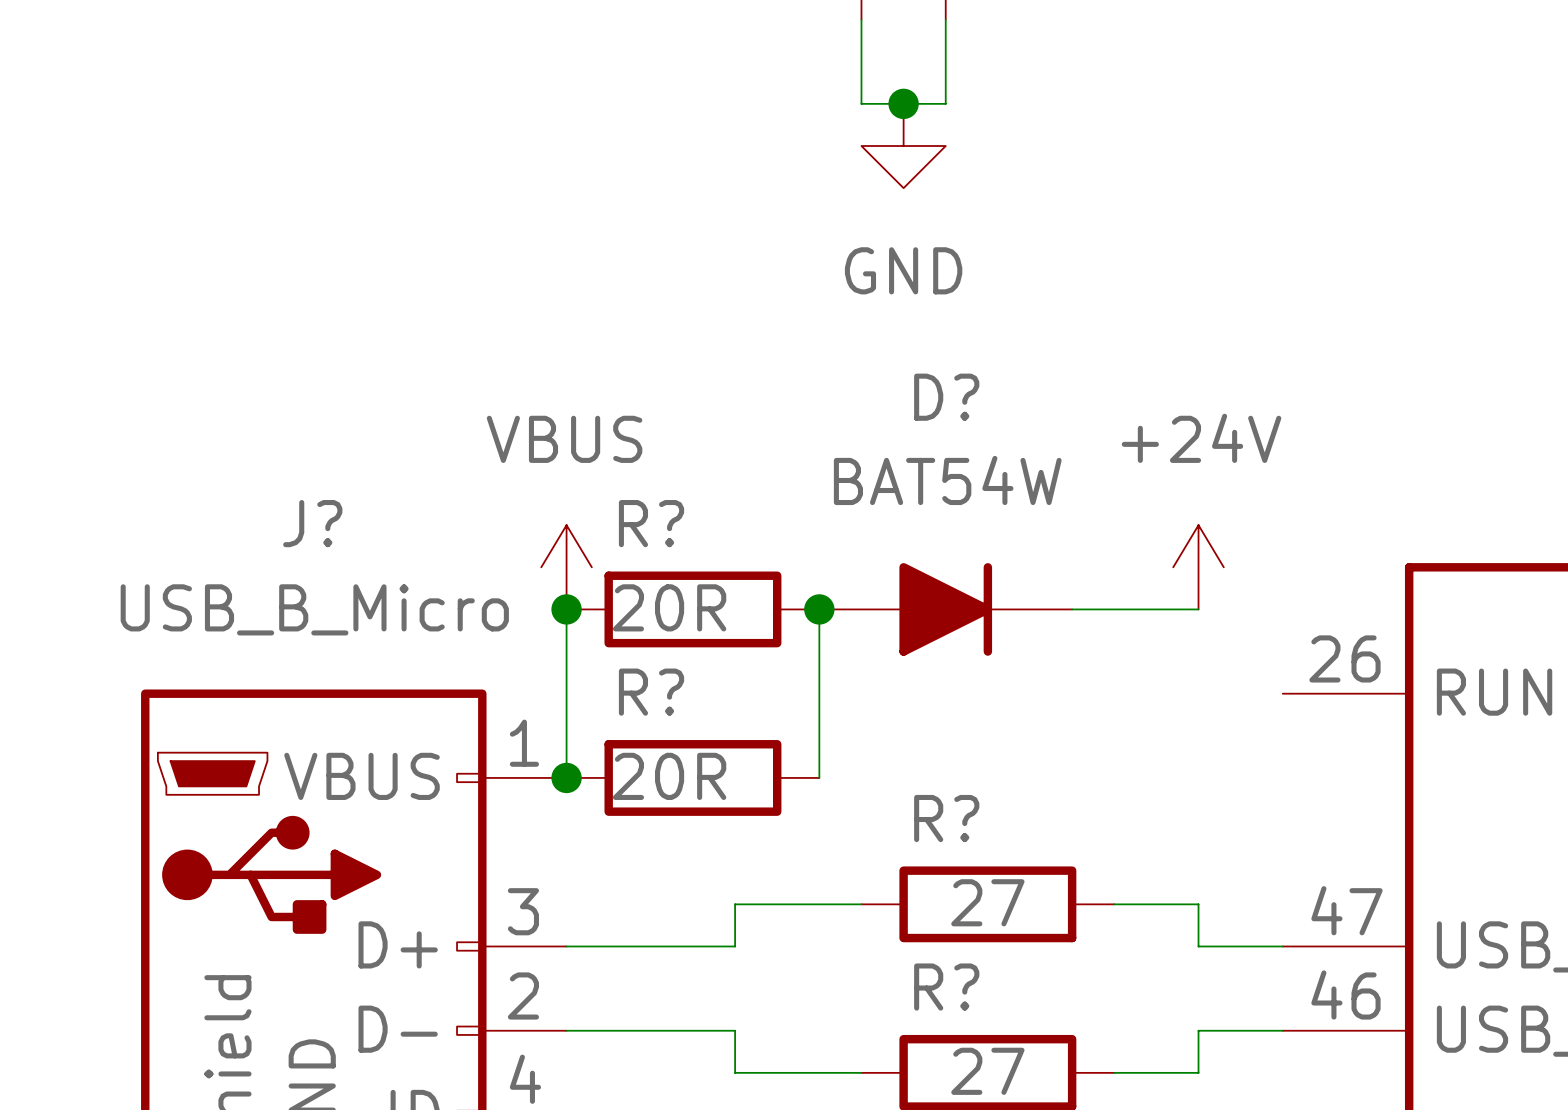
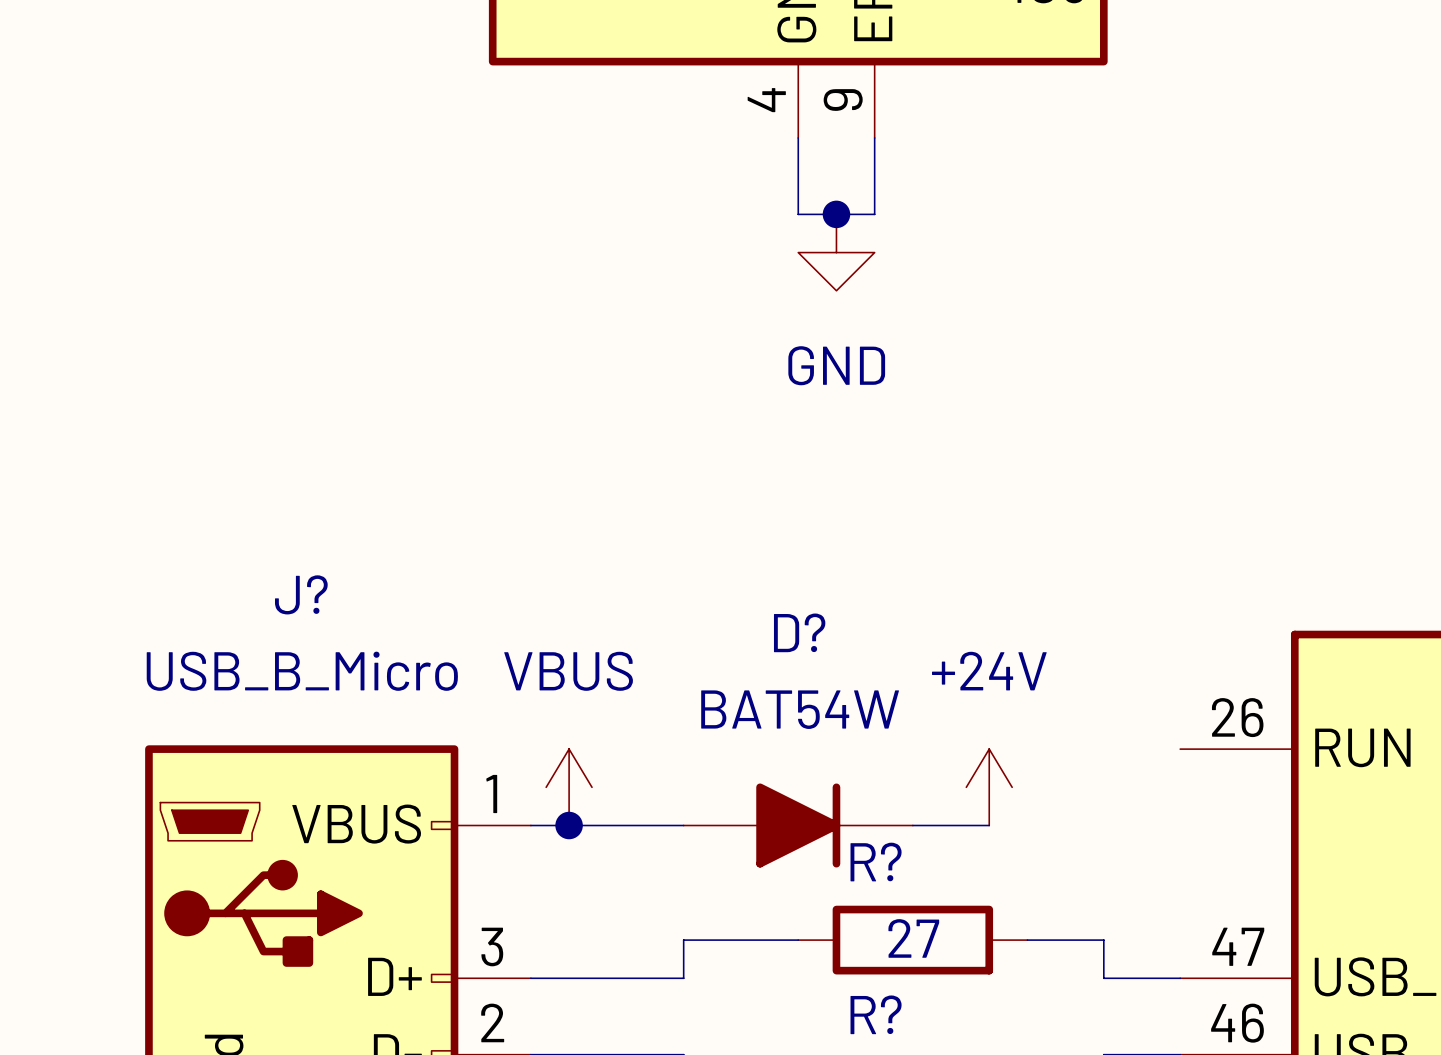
power symbol position: VBUS (566, 567) -> VBUS (569, 787)
power symbol position: +24V (1198, 567) -> +24V (989, 787)
wire: (566, 609) (566, 777) -> (683, 825) (530, 825)
junction: (566, 609) -> none
R?: 20R (692, 609) -> none
wire: (819, 609) (819, 777) -> none
junction: (819, 609) -> none
D? position: (945, 609) -> (798, 825)
wire: (1072, 609) (1198, 609) -> none
junction position: (566, 777) -> (569, 825)
R?: 20R (692, 777) -> none
wire: none -> (912, 825) (989, 825)

